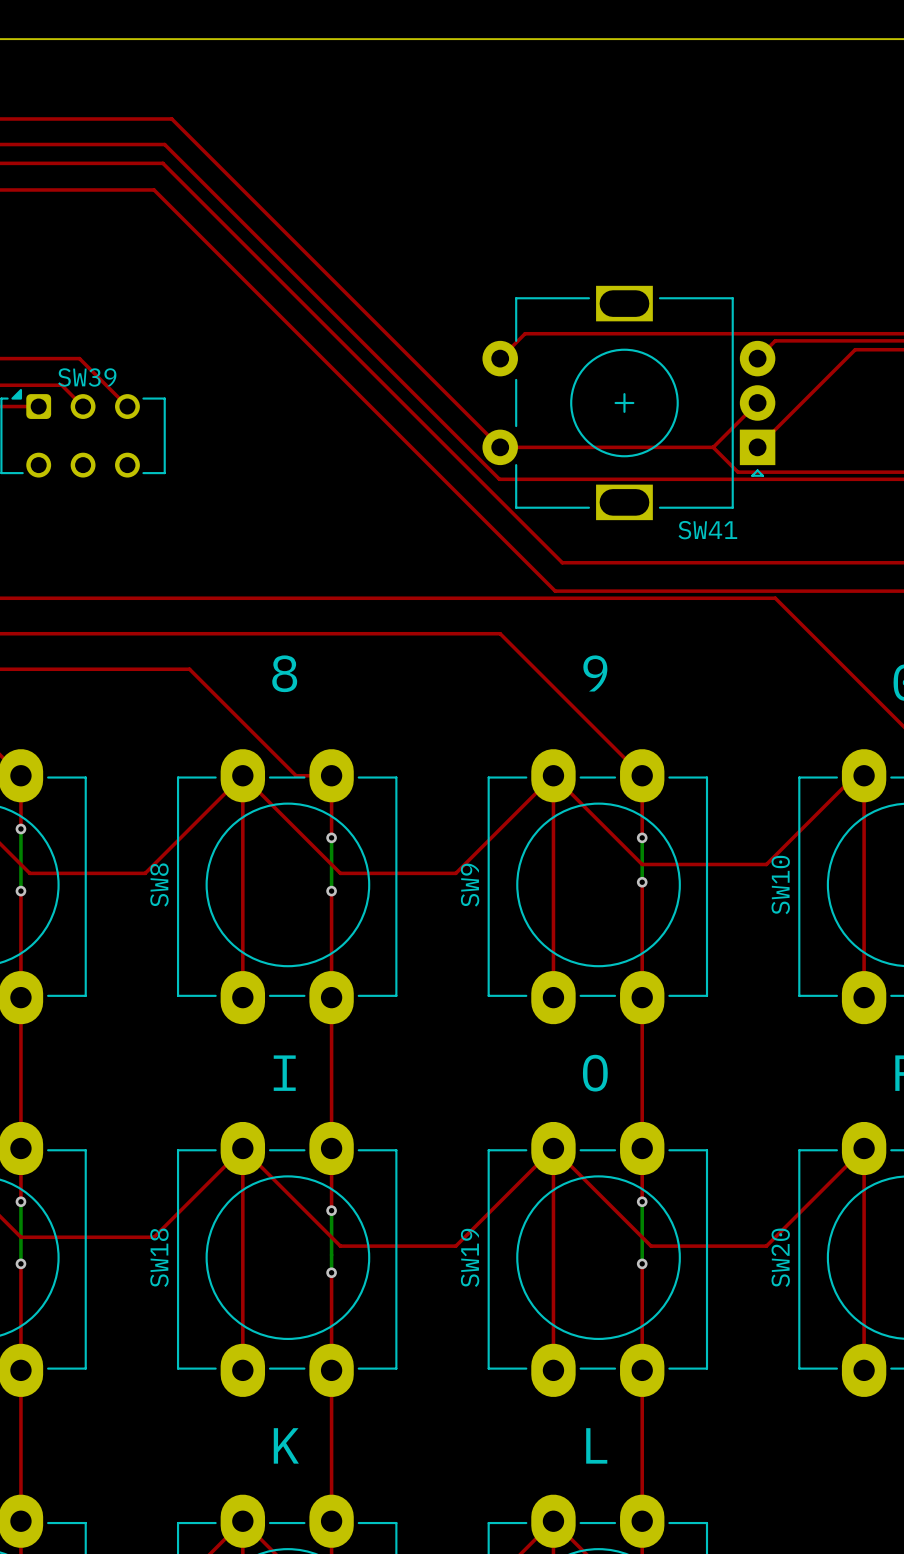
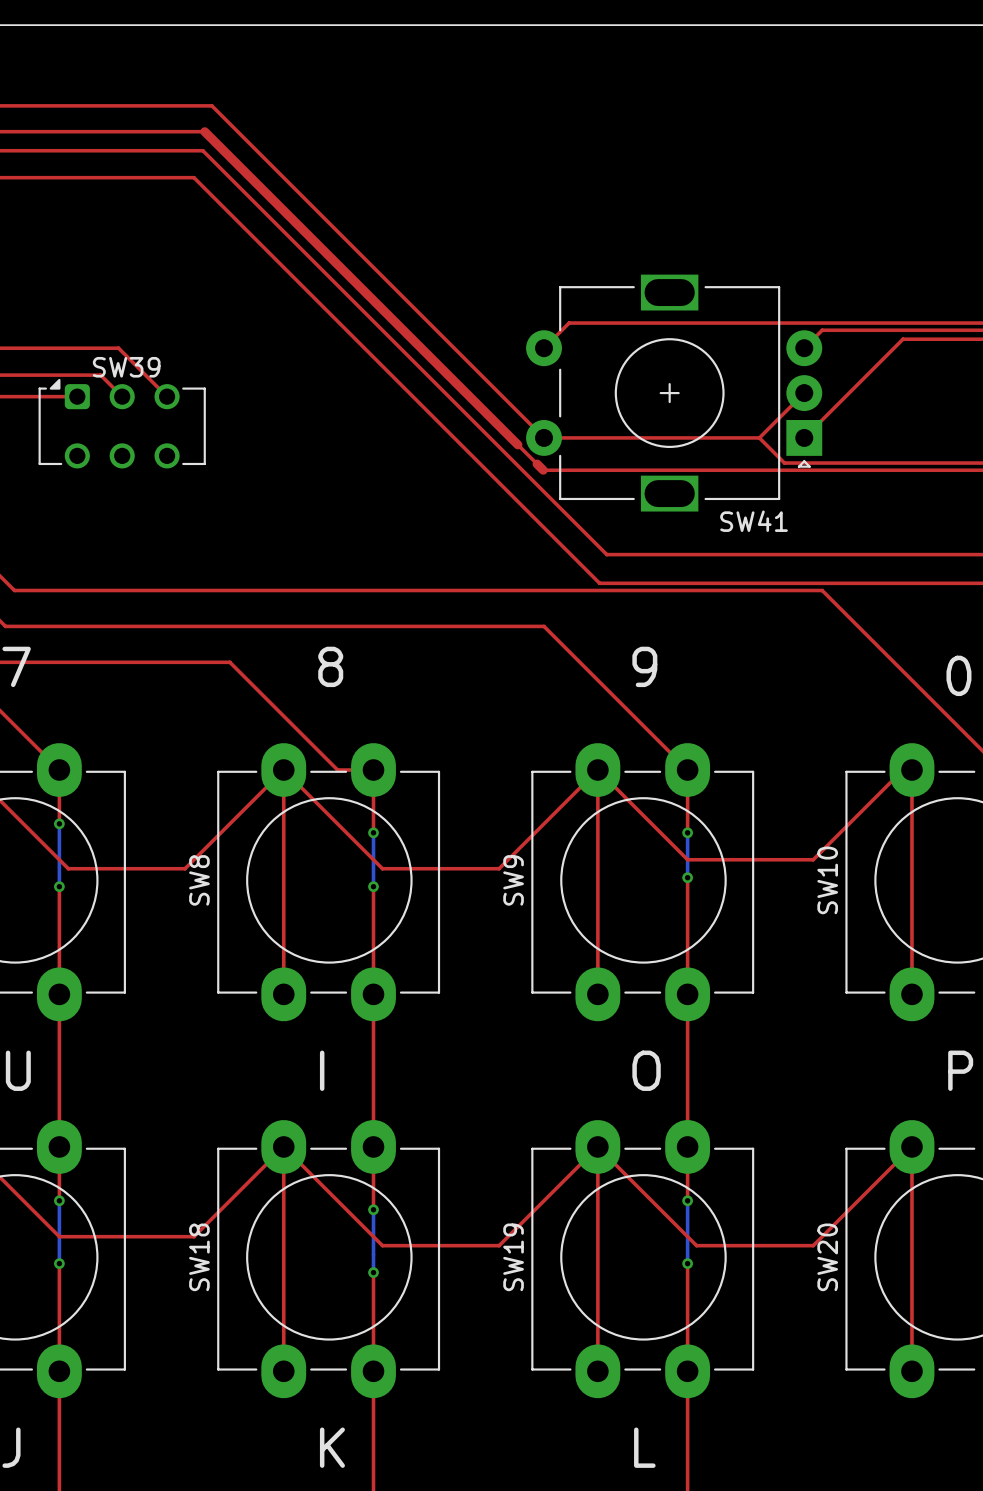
top track width: thin (164, 144) (474, 454) -> thick (204, 131) (517, 444)
top track width: thin (493, 473) (499, 479) -> thick (537, 463) (543, 470)

